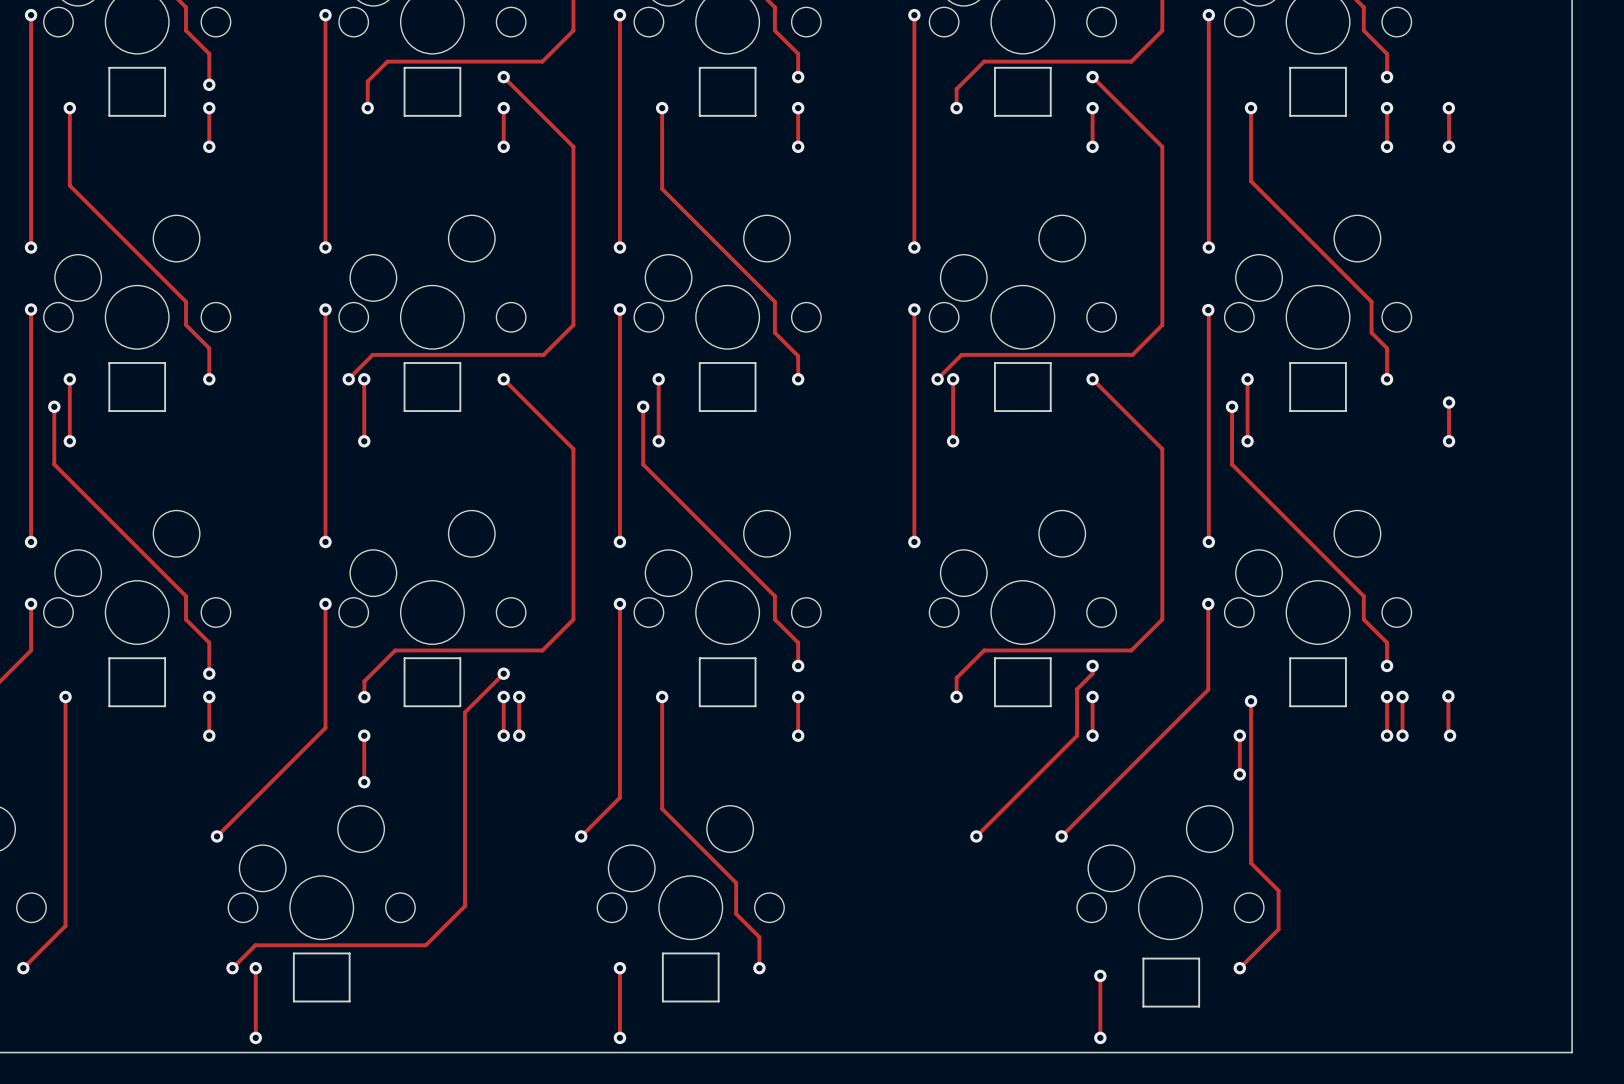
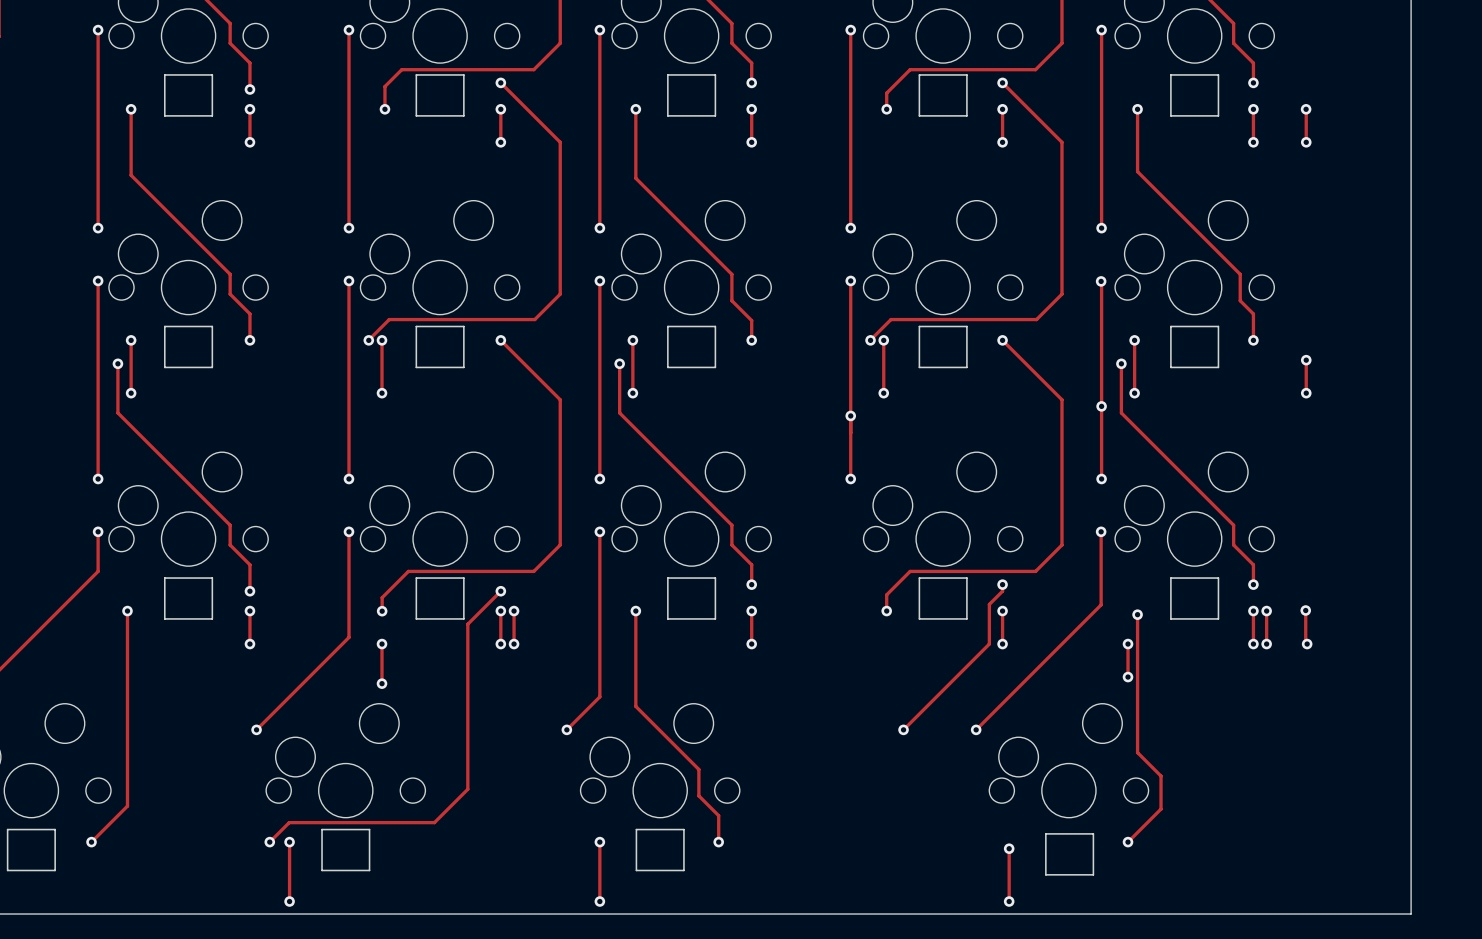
via: none -> (1101, 406)
via: none -> (850, 415)

